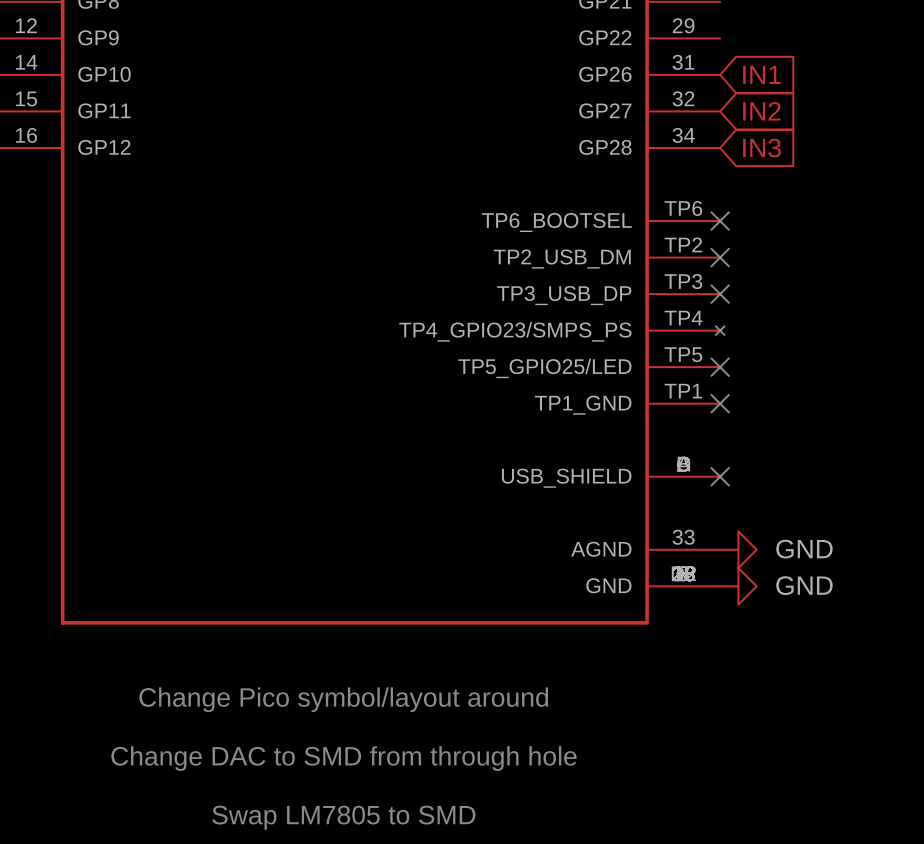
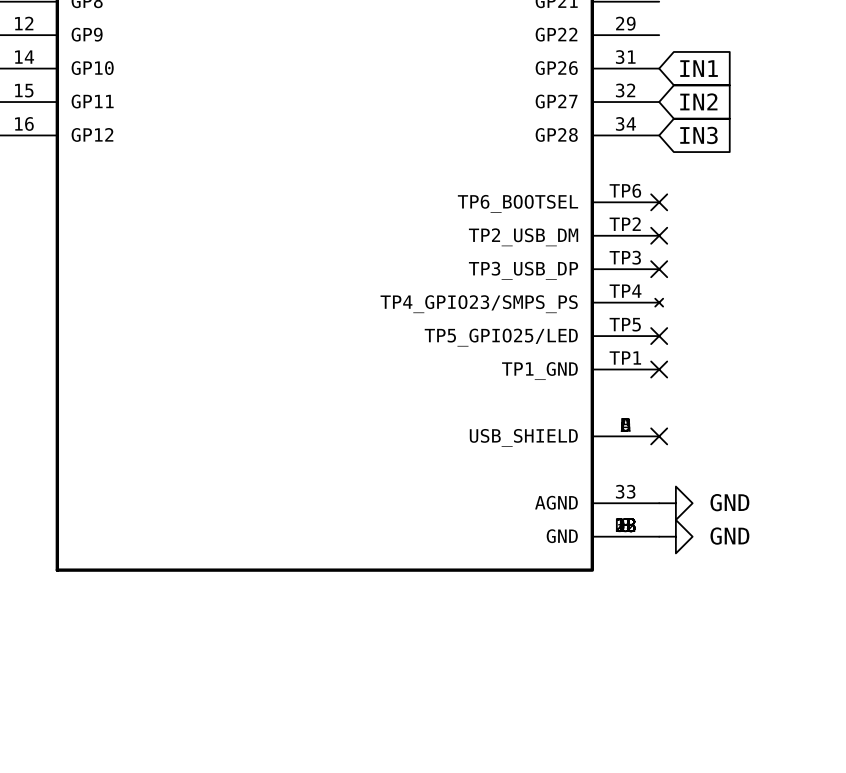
text: Change Pico symbol/layout around (343, 699) -> none
text: Change DAC to SMD from through hole (343, 758) -> none
text: Swap LM7805 to SMD (343, 817) -> none

